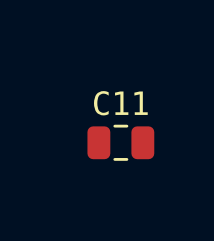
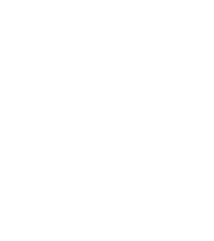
C11: (120, 142) -> none

